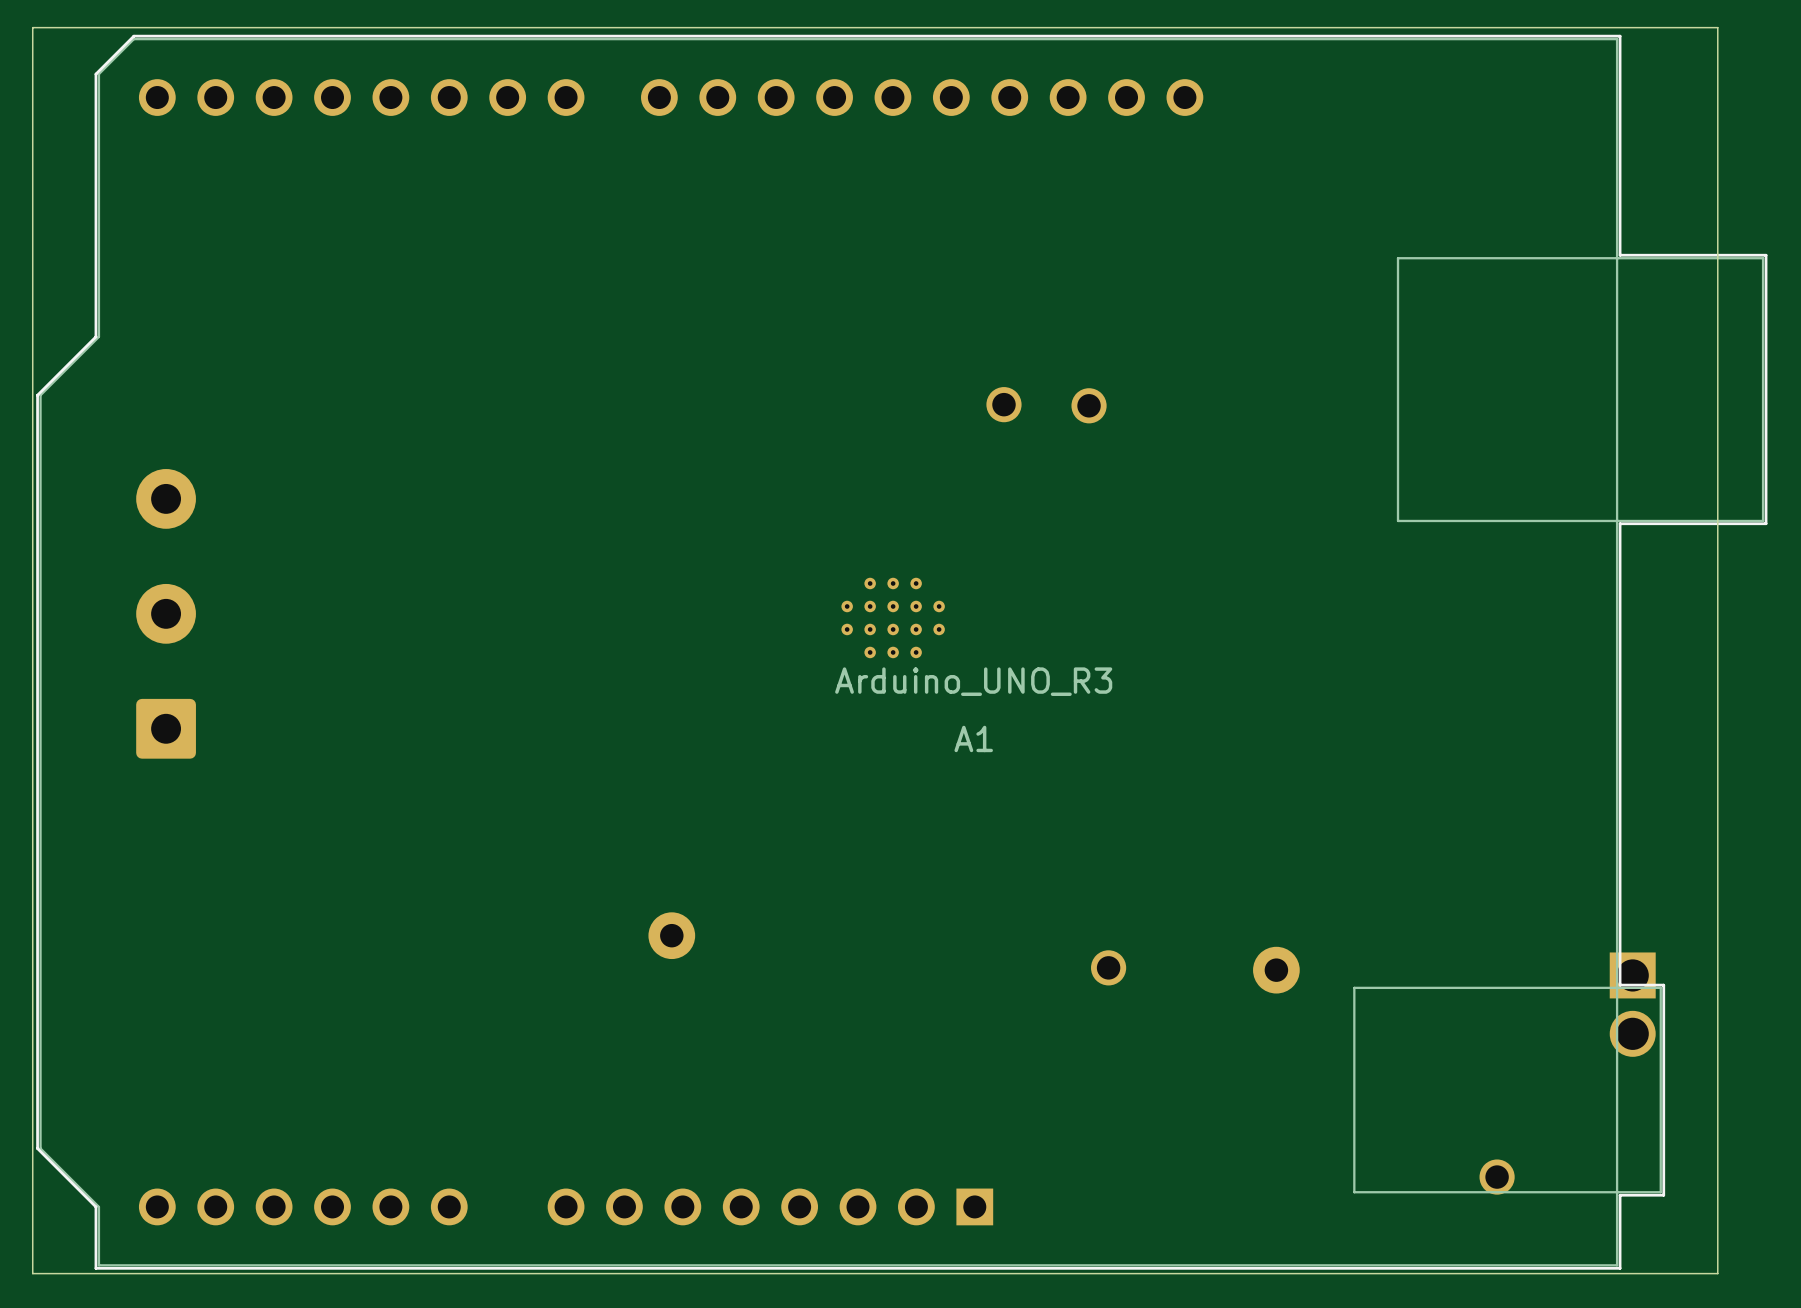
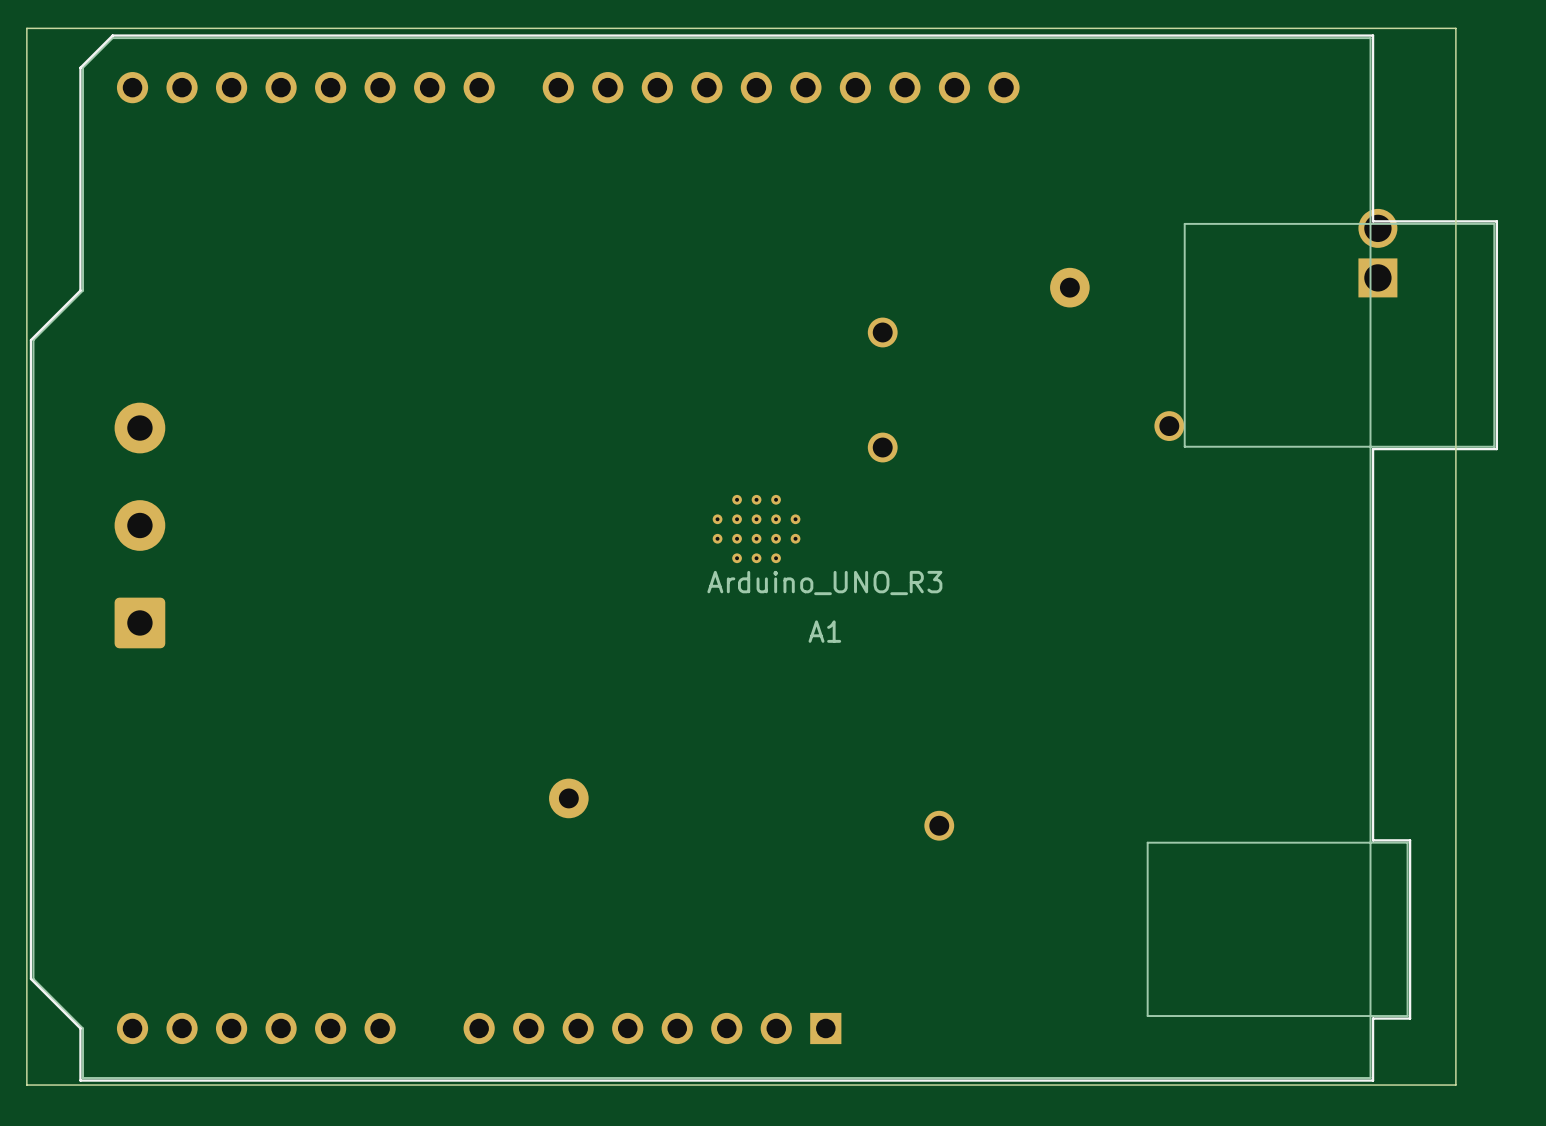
part: none -> (1377, 253)
part: none -> (1069, 287)
part: none -> (882, 332)
part: (1003, 404) -> none
part: (1089, 405) -> none
part: none -> (1169, 426)
part: none -> (882, 447)
part: (1276, 970) -> none
part: (1632, 1004) -> none
part: (1497, 1177) -> none

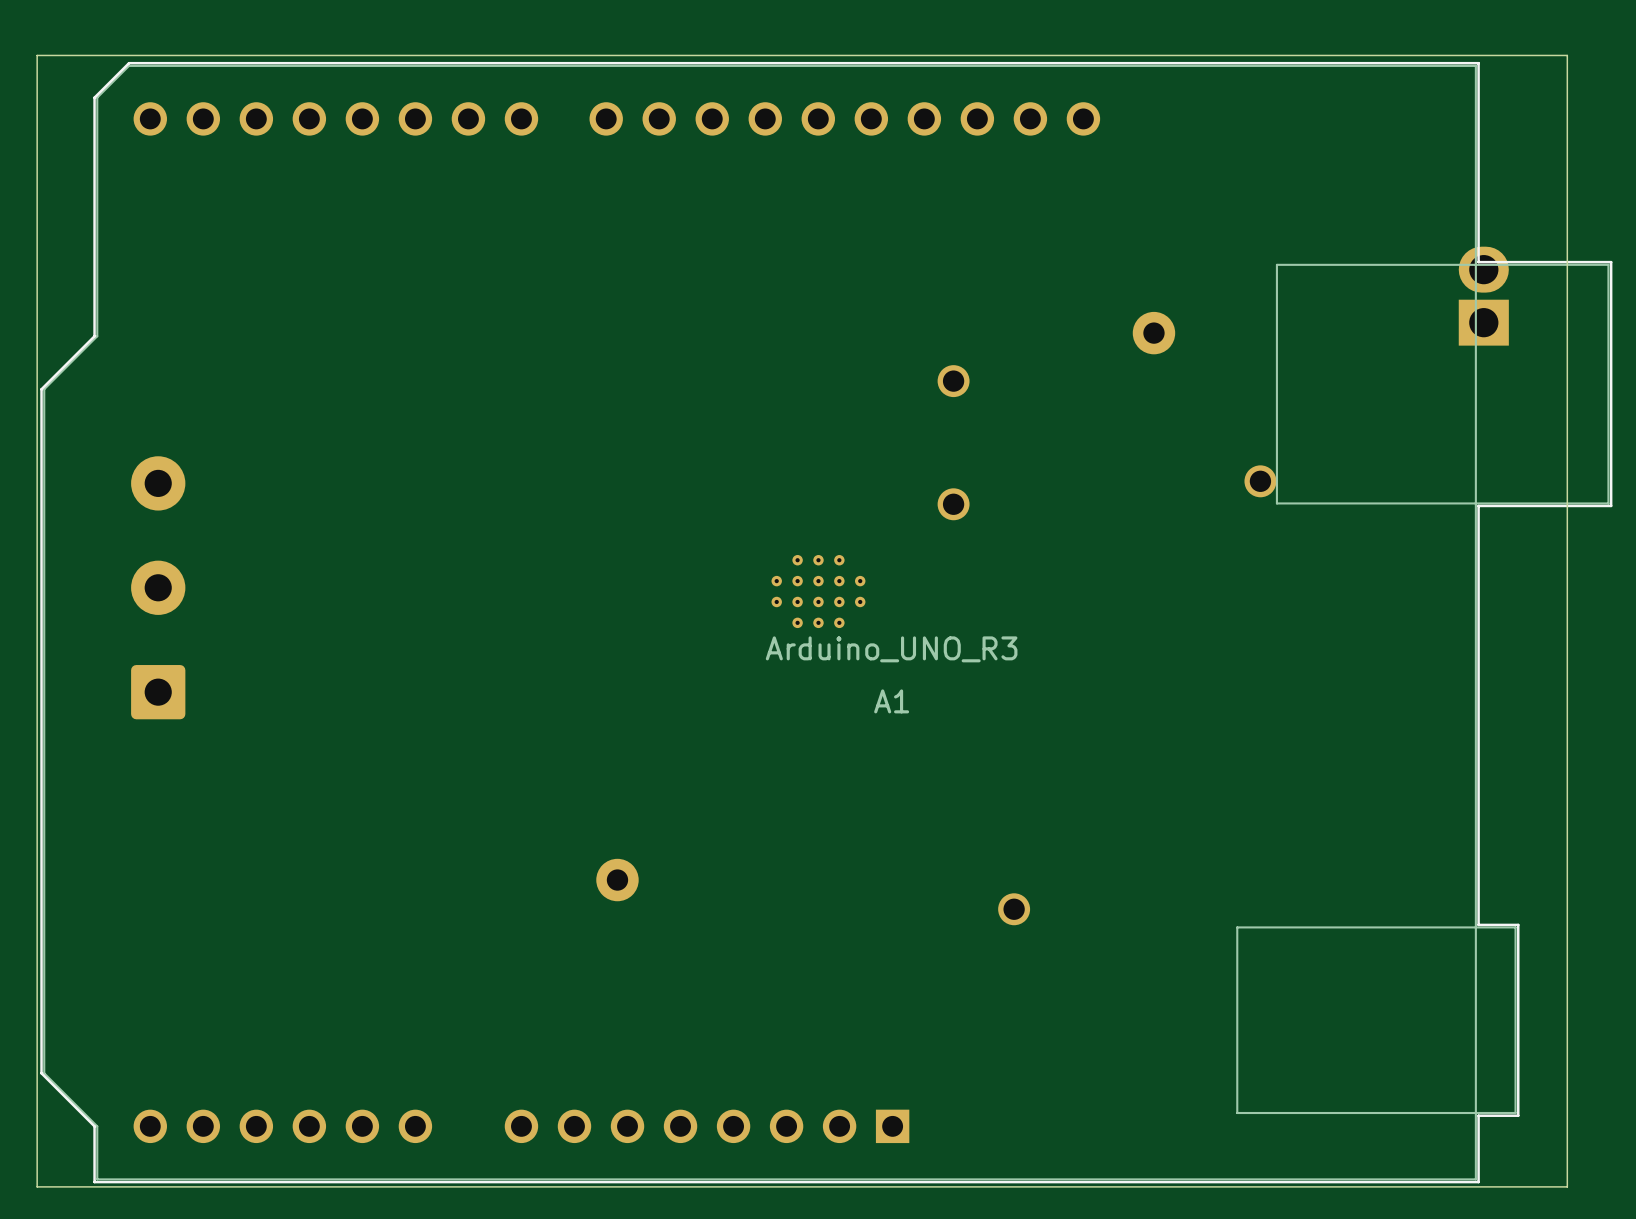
part footprint: [1358, 208, 1398, 298] -> [1458, 246, 1509, 346]

